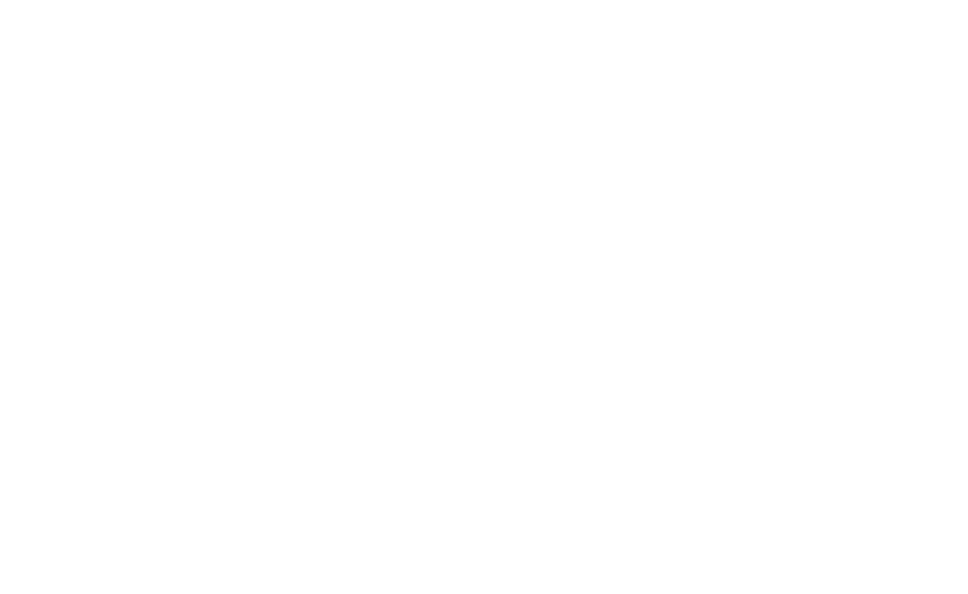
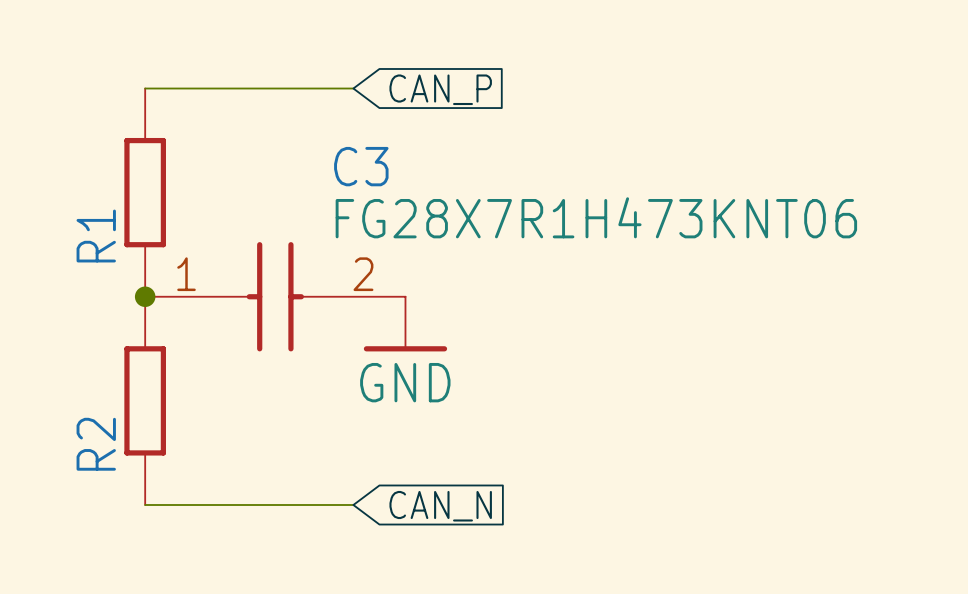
wire: none -> (145, 88) (353, 88)
global label: none -> CAN_P (440, 89)
R1: none -> (145, 192)
junction: none -> (145, 296)
C3: none -> FG28X7R1H473KNT06 (275, 296)
power symbol: none -> GND (405, 324)
R2: none -> (145, 400)
wire: none -> (145, 505) (353, 505)
global label: none -> CAN_N (440, 506)

